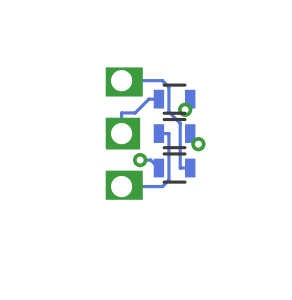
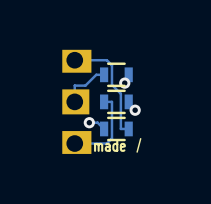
text: none -> made (109, 145)
text: none -> / (138, 145)

